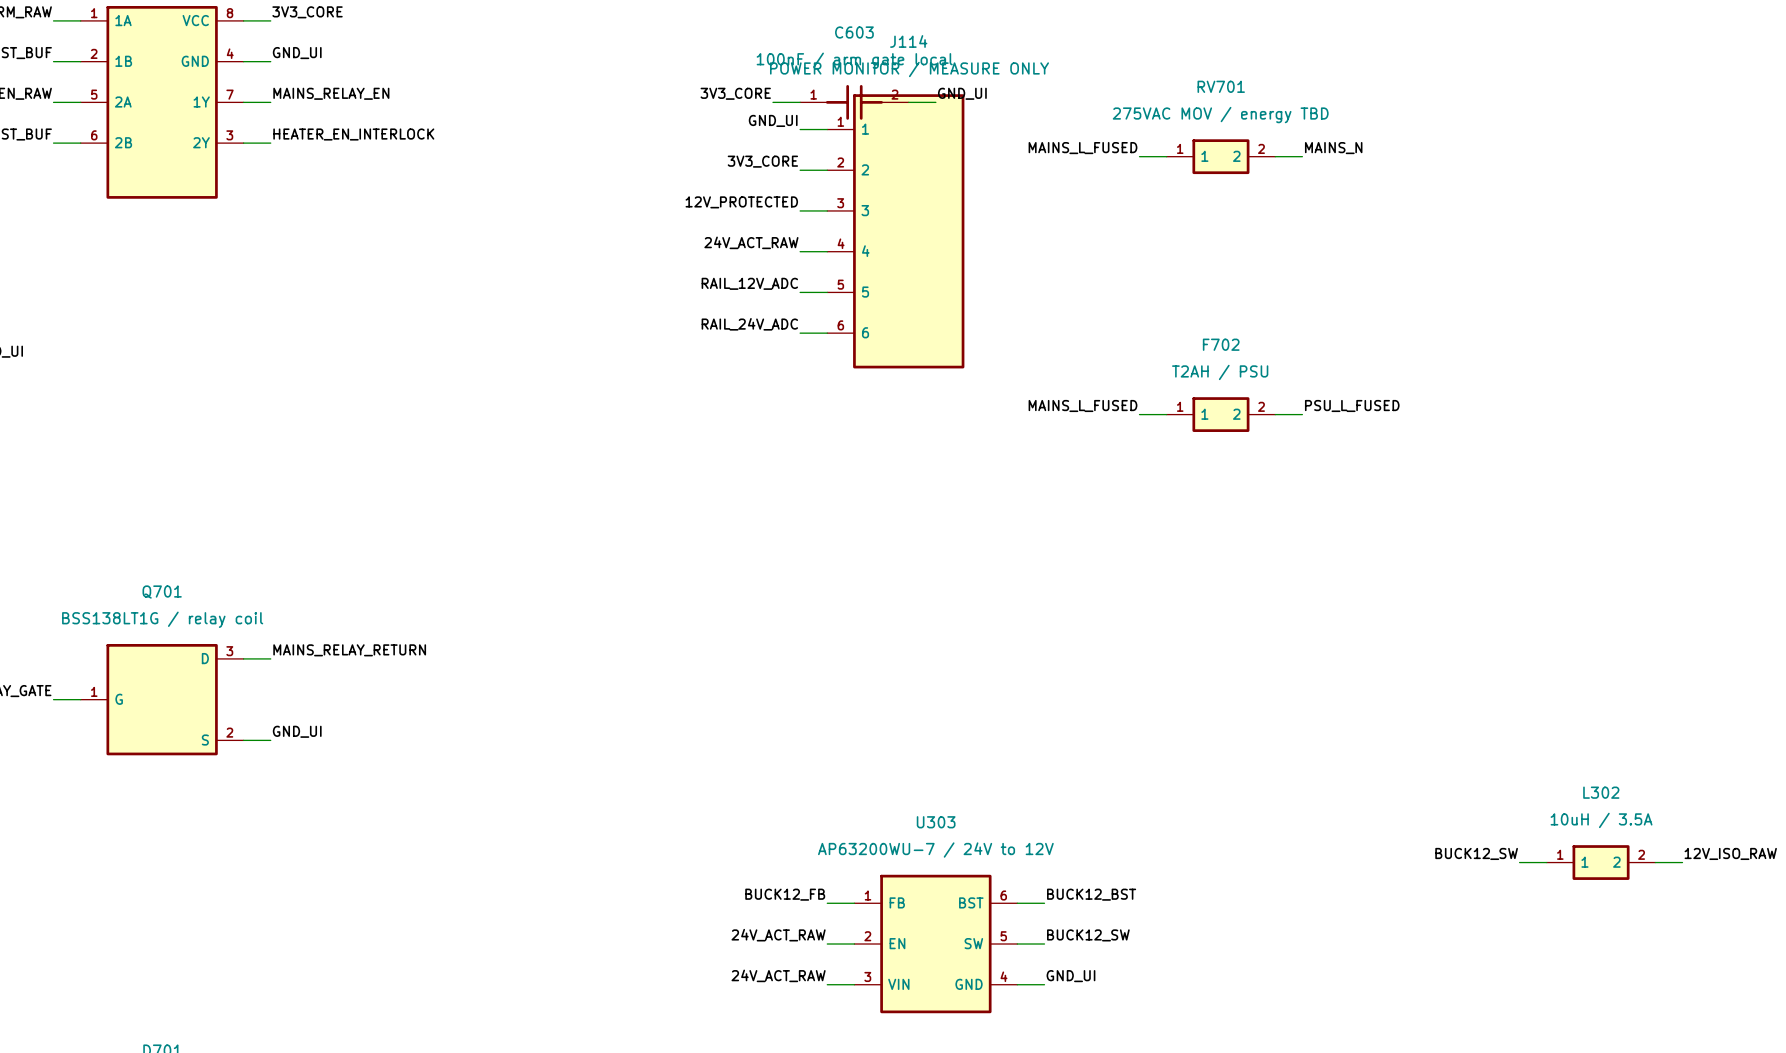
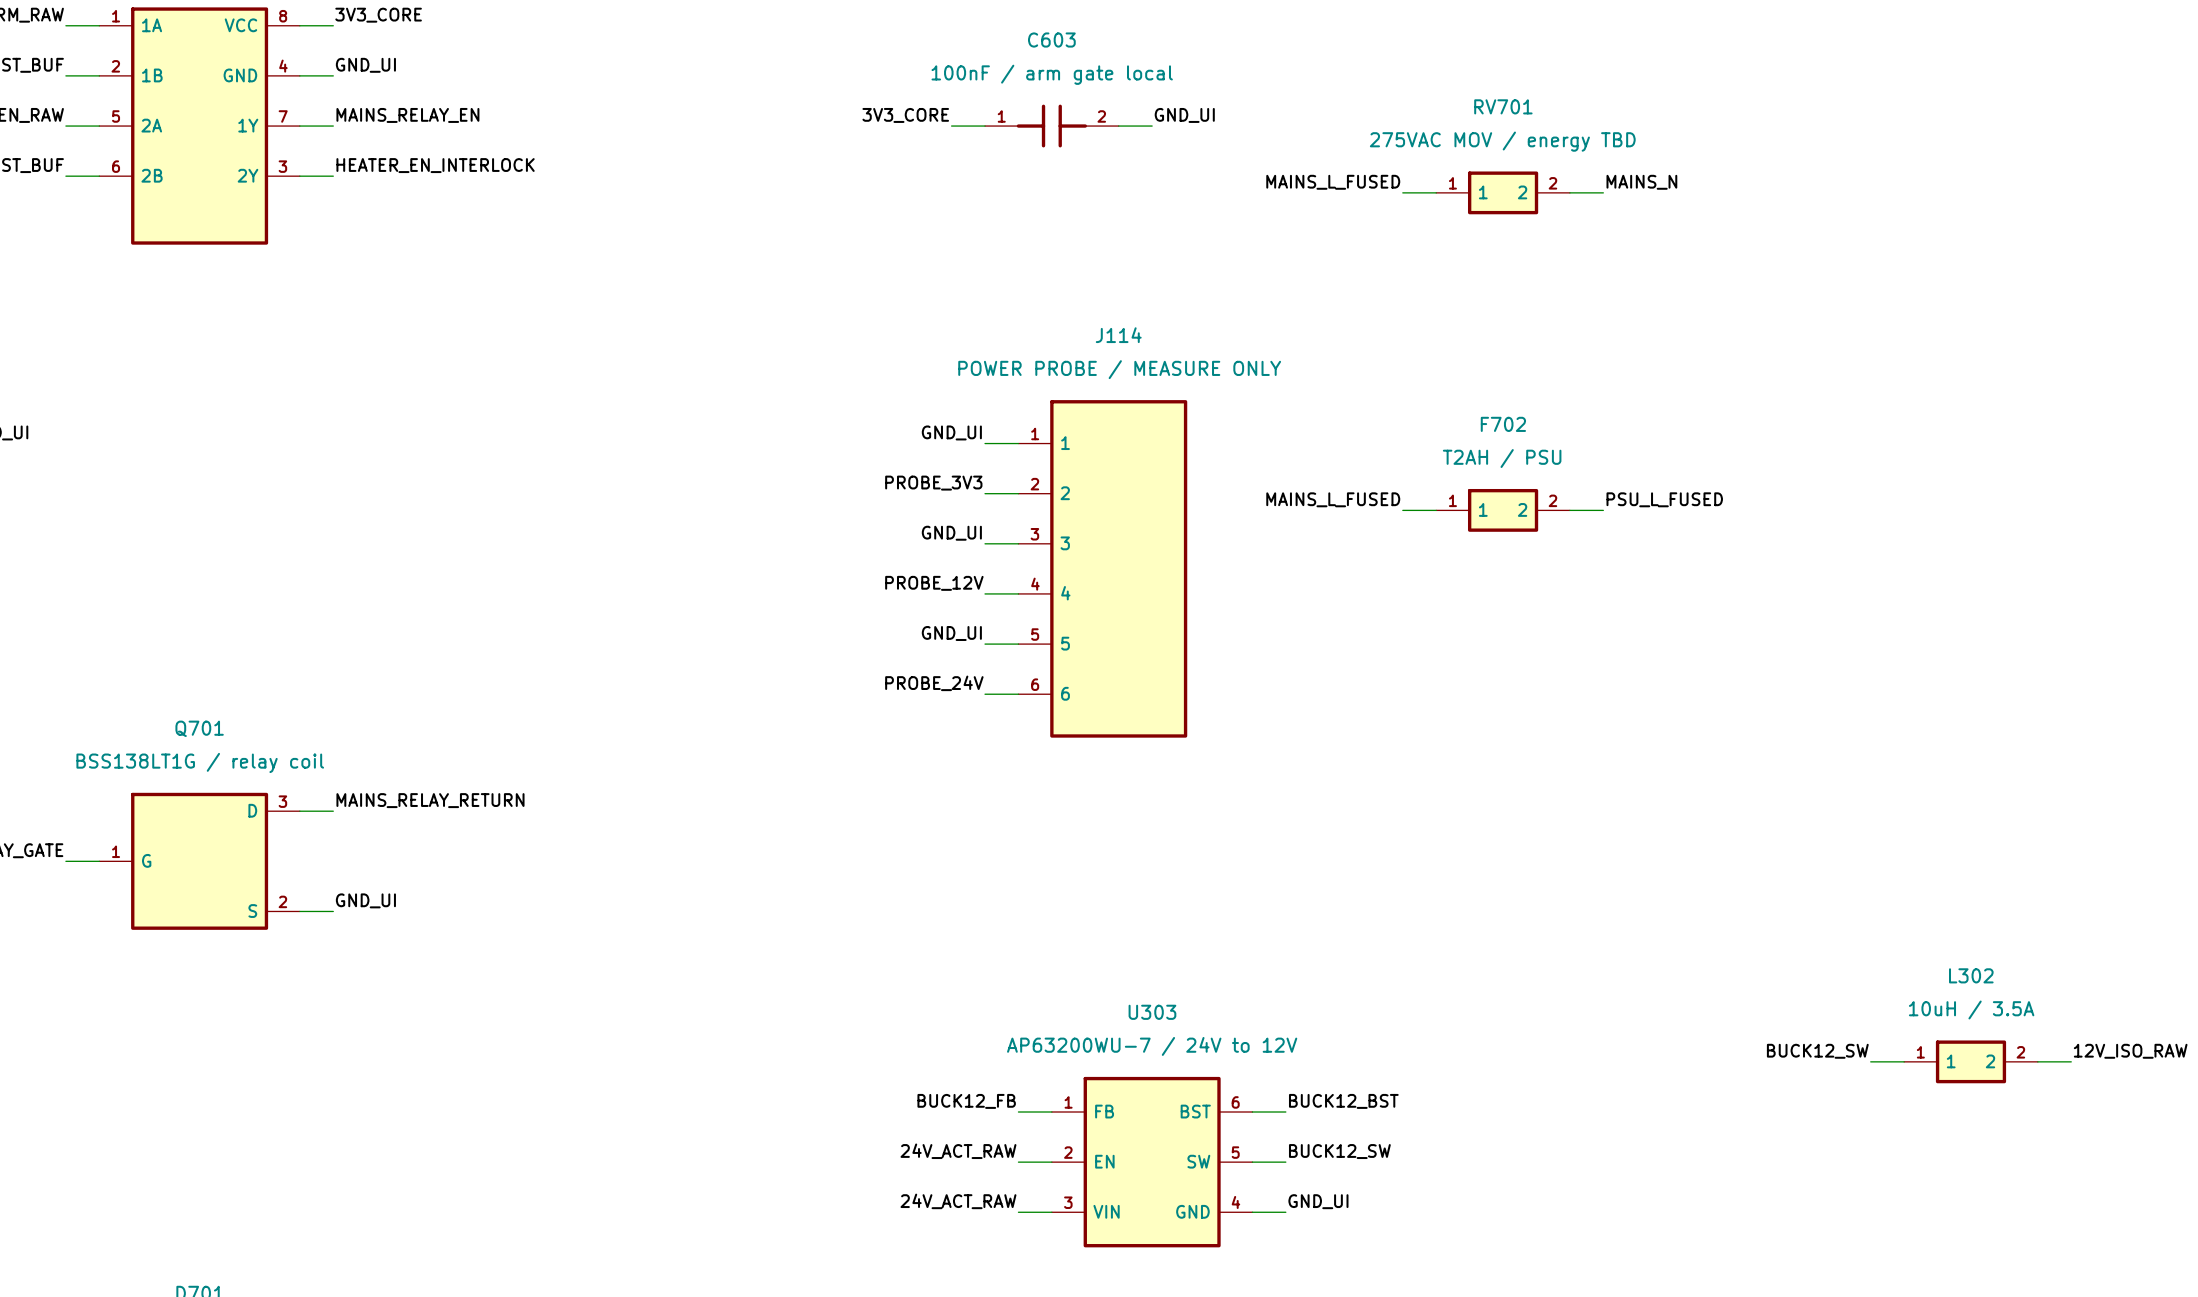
J114 value: POWER MONITOR / MEASURE ONLY (909, 69) -> POWER PROBE / MEASURE ONLY (1119, 369)
label: GND_UI (773, 120) -> none
wire: (800, 129) (827, 129) -> (985, 443) (1018, 443)
label: 3V3_CORE (762, 161) -> none
wire: (800, 170) (827, 170) -> (985, 493) (1018, 493)
label: 12V_PROTECTED (741, 202) -> none
wire: (800, 210) (827, 210) -> (985, 543) (1018, 543)
J114 position: (895, 231) -> (1102, 568)
label: 24V_ACT_RAW (751, 242) -> none
wire: (800, 251) (827, 251) -> (985, 593) (1018, 593)
label: RAIL_12V_ADC (749, 283) -> none
wire: (800, 292) (827, 292) -> (985, 644) (1018, 644)
label: RAIL_24V_ADC (749, 324) -> none
wire: (800, 333) (827, 333) -> (985, 694) (1018, 694)
label: none -> GND_UI (951, 432)
label: none -> PROBE_3V3 (933, 483)
label: none -> GND_UI (951, 533)
label: none -> PROBE_12V (934, 583)
label: none -> GND_UI (951, 633)
label: none -> PROBE_24V (934, 683)

